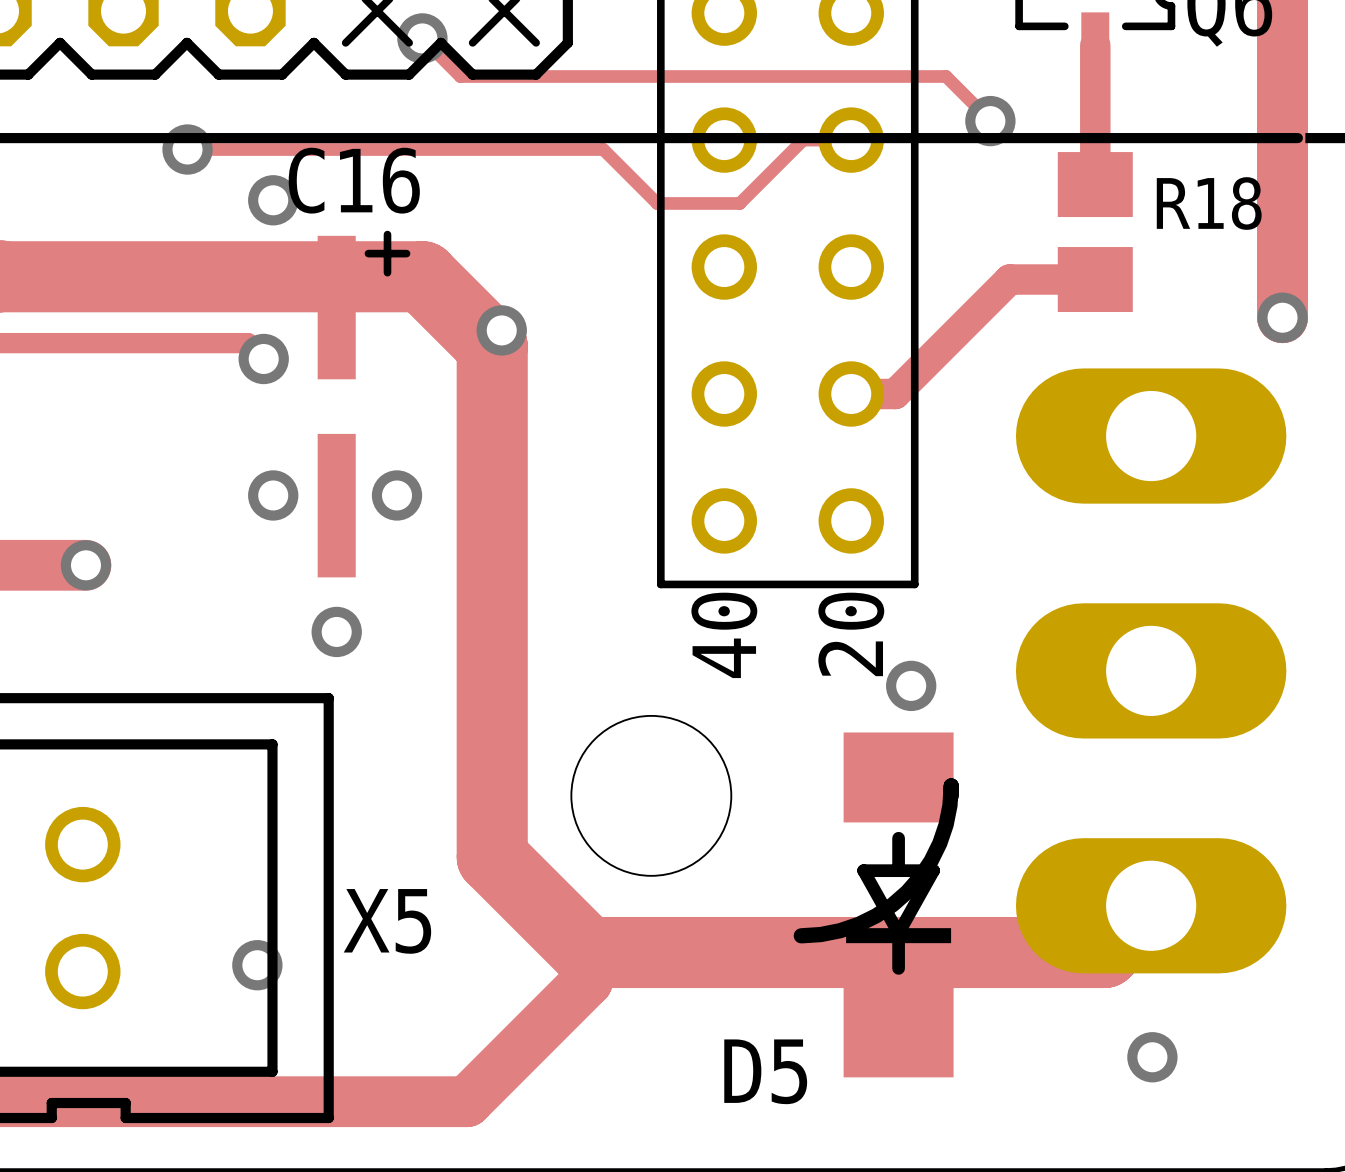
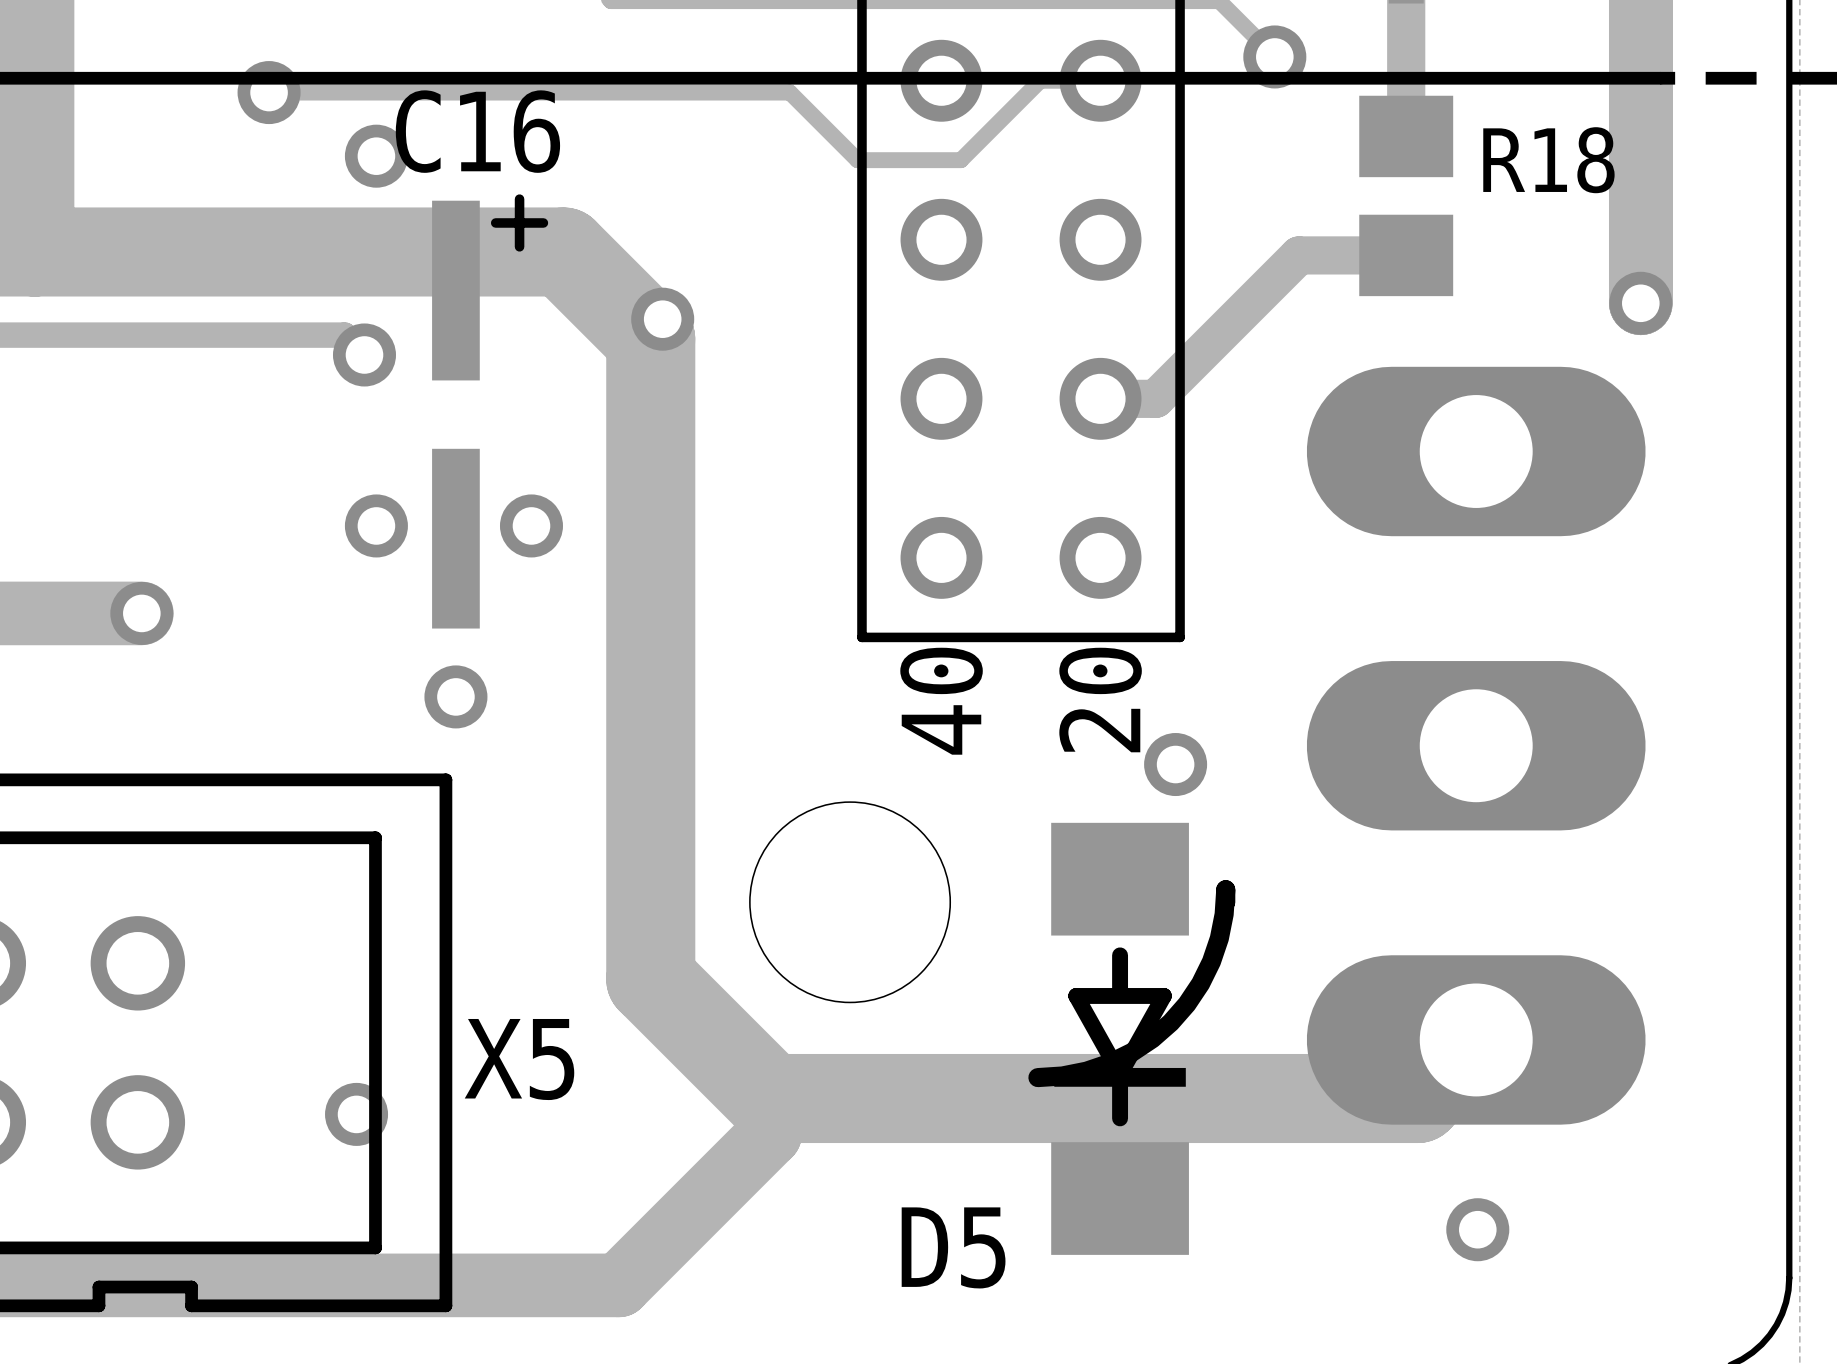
D5 position: (898, 904) -> (1120, 1038)

